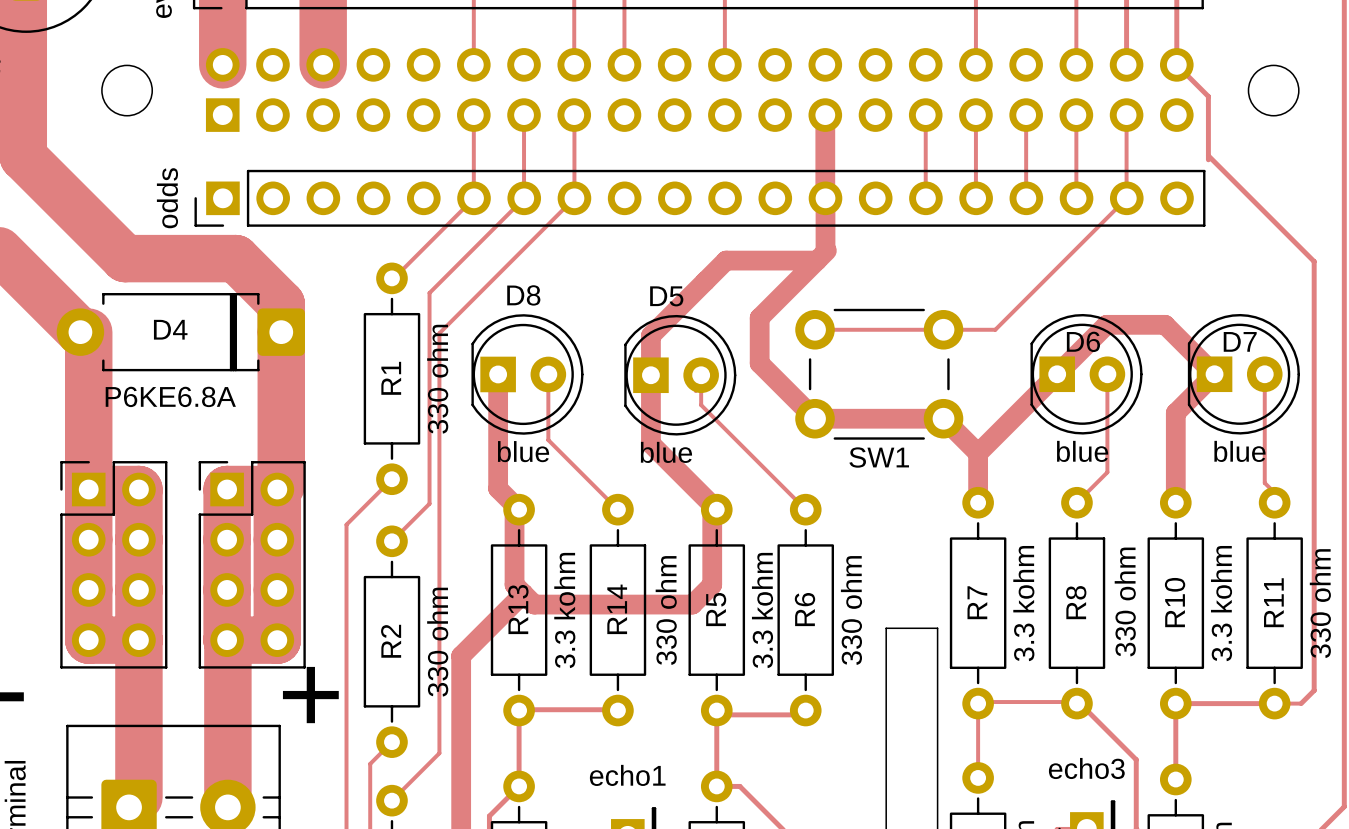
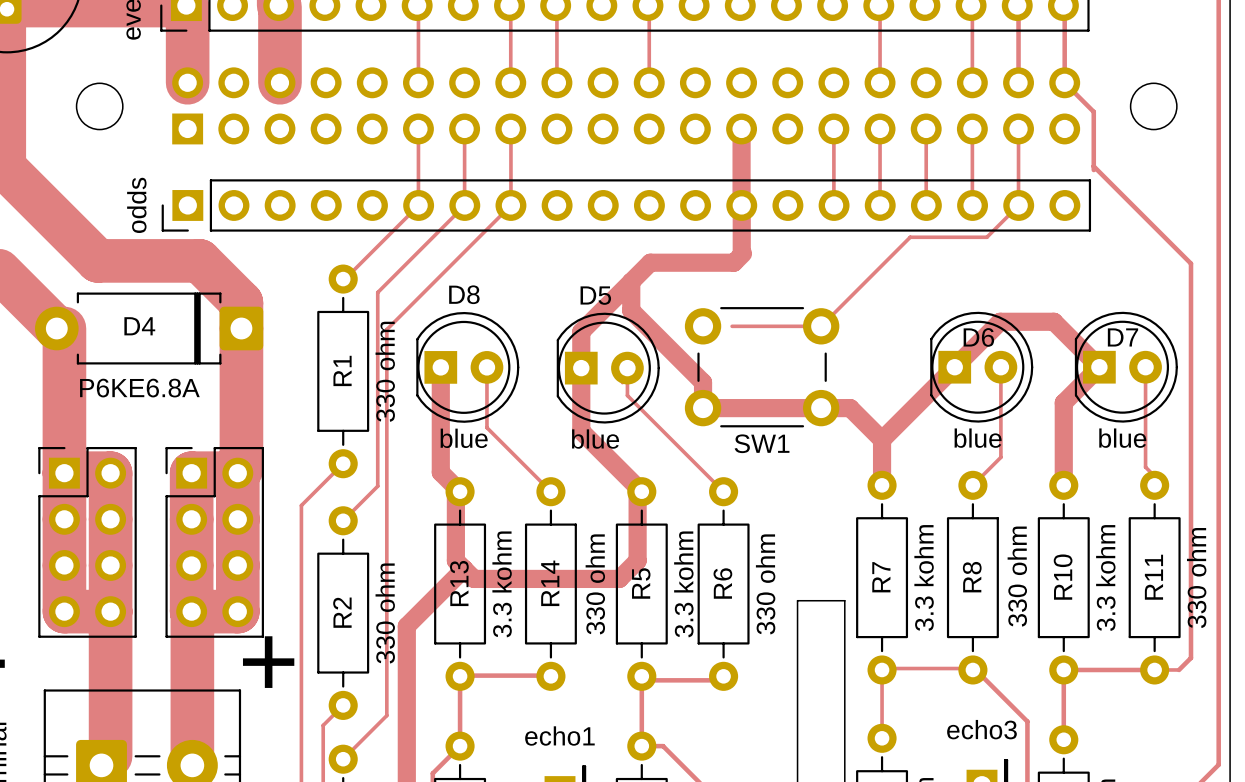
top track: (1092, 232) (995, 329) (911, 329) -> (986, 237) (910, 237) (821, 326)
top track: (817, 260) (759, 317) (759, 363) (815, 418) -> (631, 281) (631, 310) (703, 382) (703, 408) (732, 408)
SW1 position: (879, 374) -> (762, 367)

